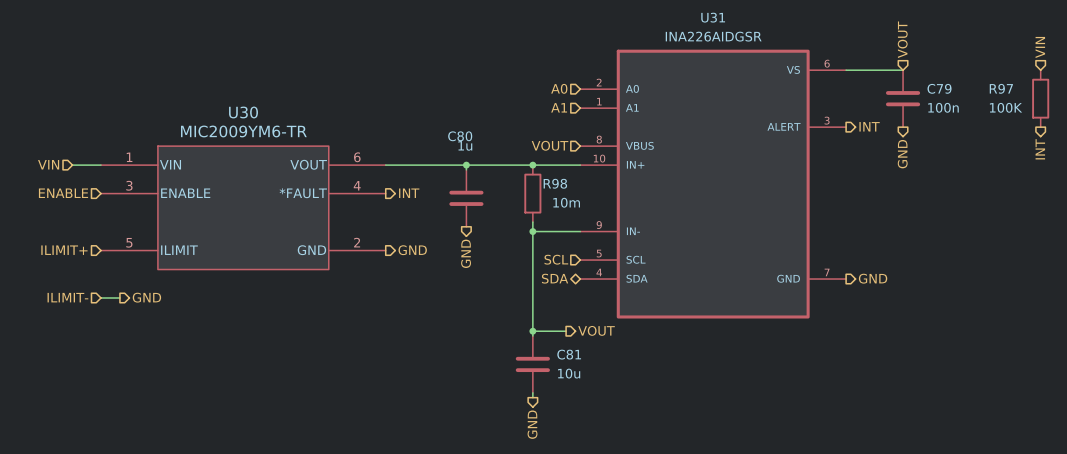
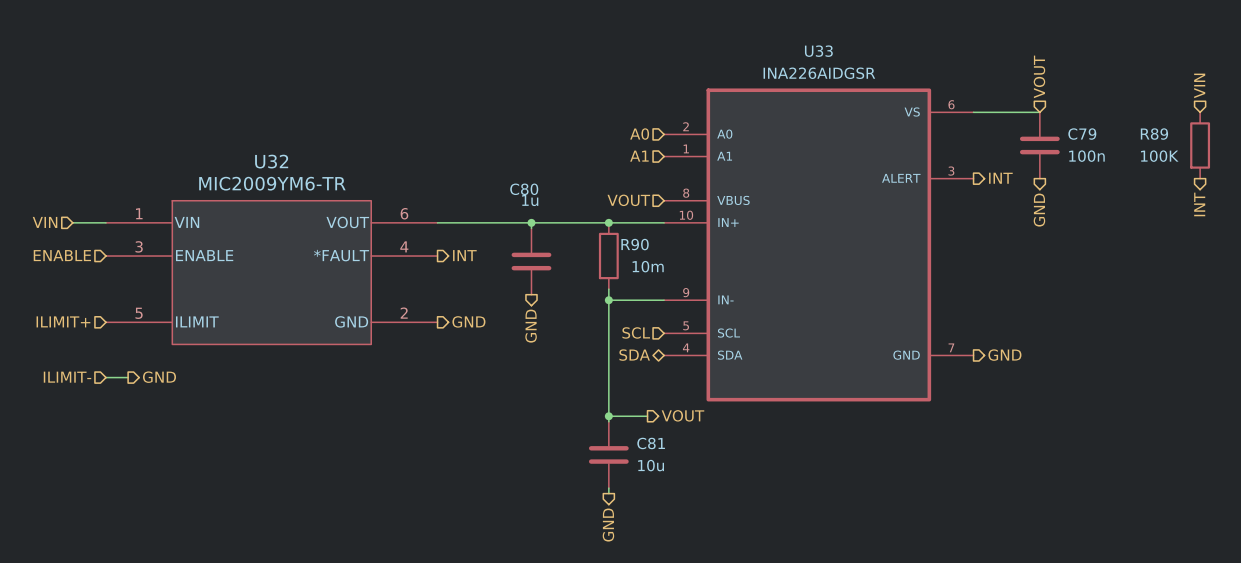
U31 name: U31 (713, 17) -> U33 (818, 51)
R97 name: R97 (1001, 88) -> R89 (1154, 134)
U30 name: U30 (243, 112) -> U32 (271, 161)
R98 name: R98 (555, 183) -> R90 (635, 244)

